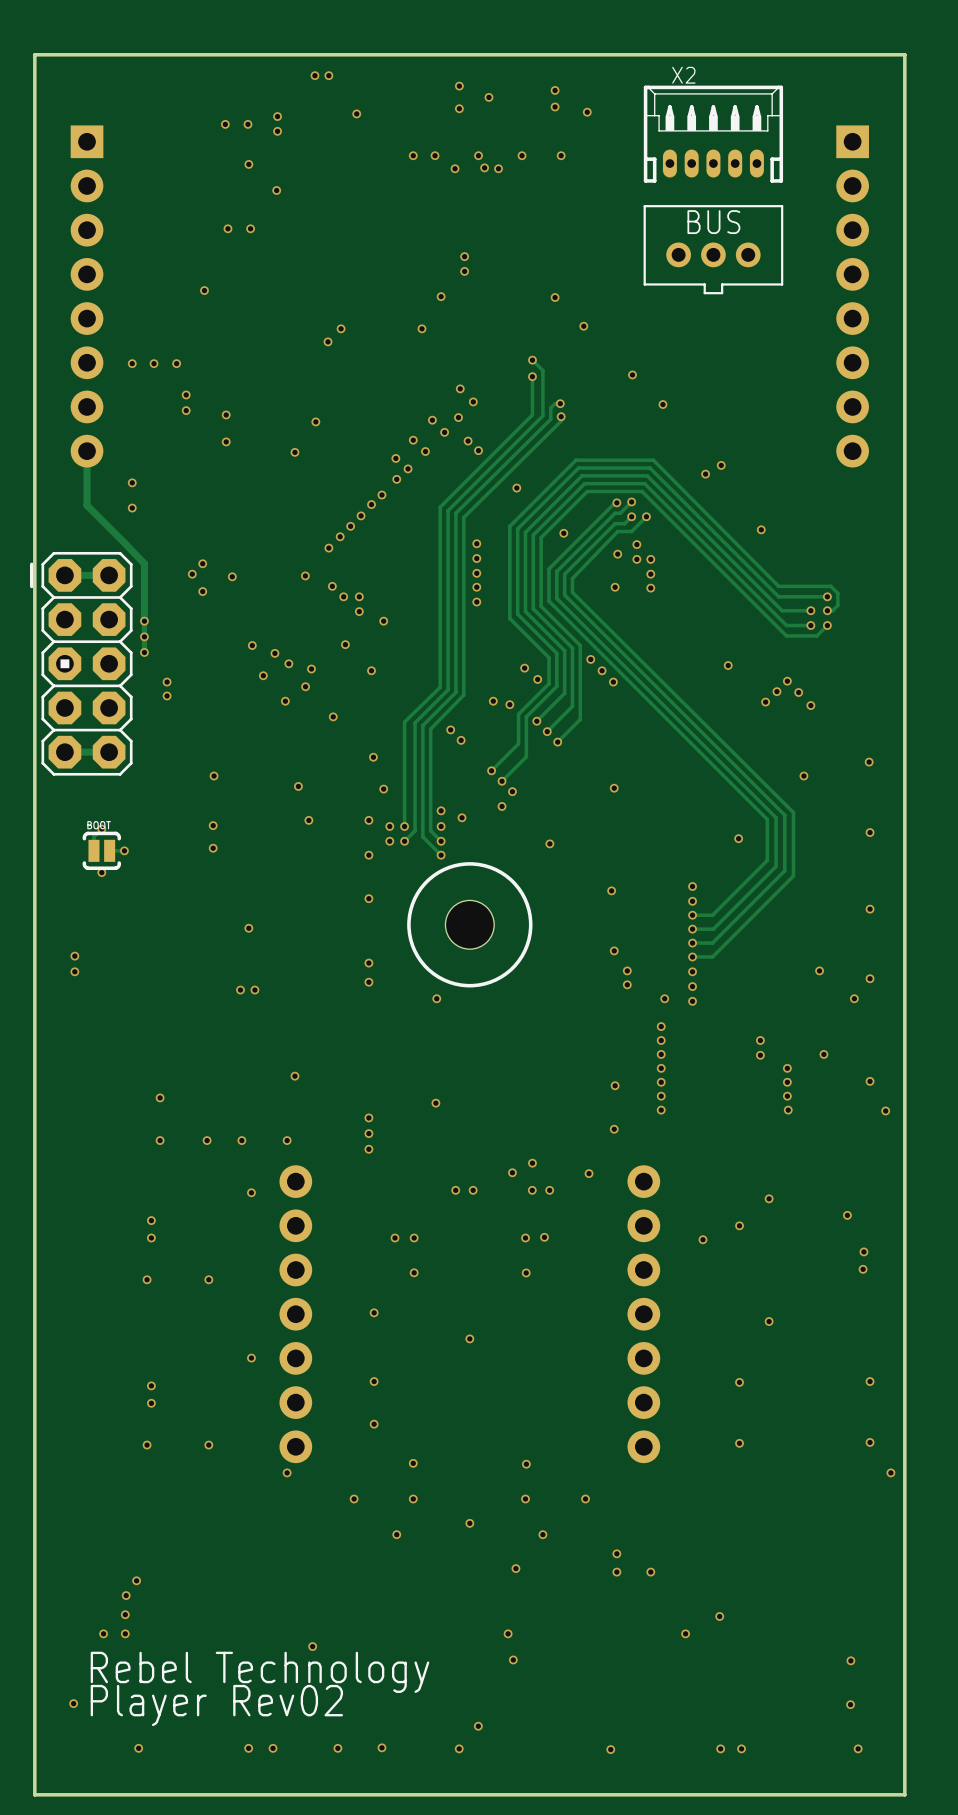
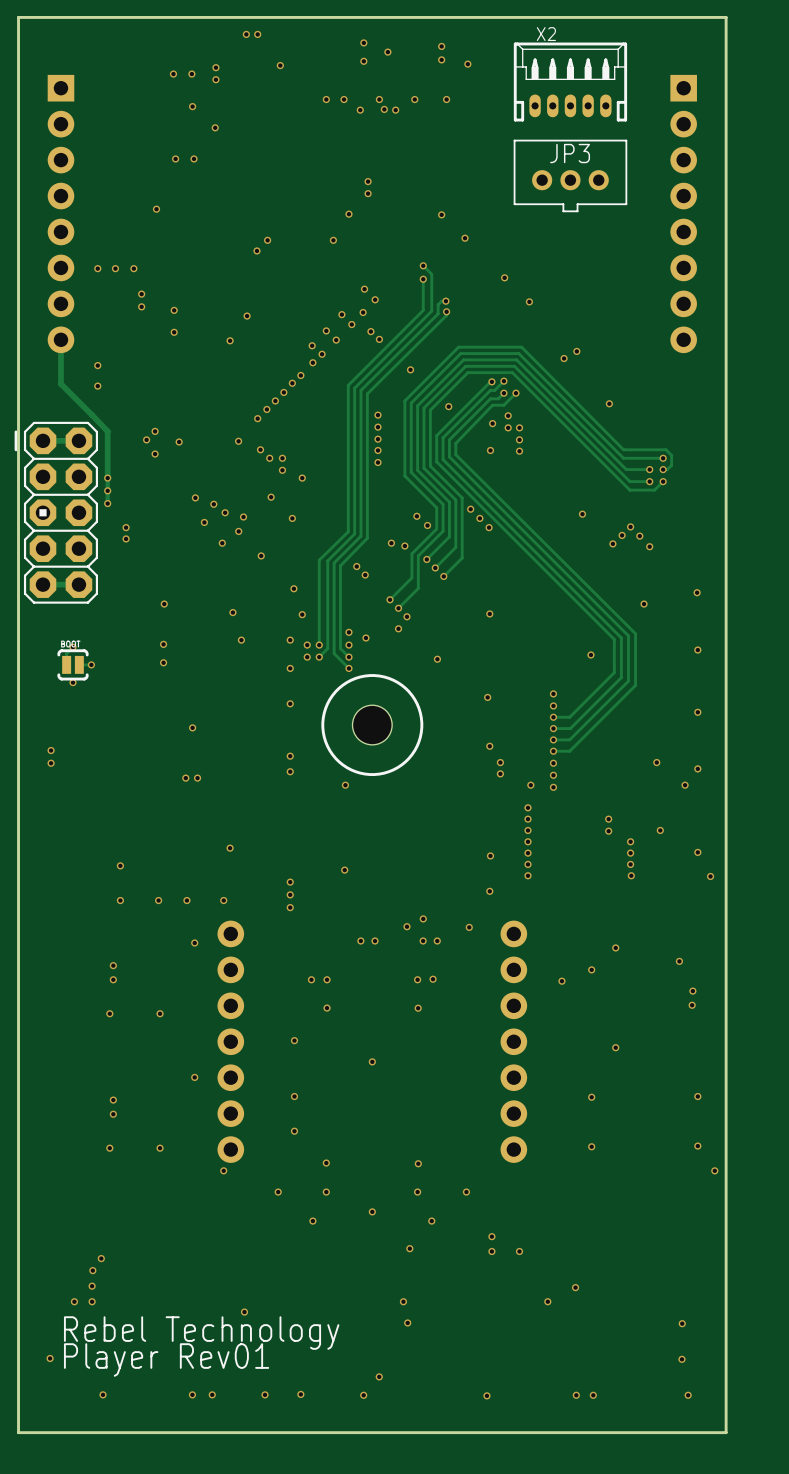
BUS name: BUS (713, 222) -> JP3 (570, 153)
text: Player Rev02 (216, 1705) -> Player Rev01 (166, 1359)

